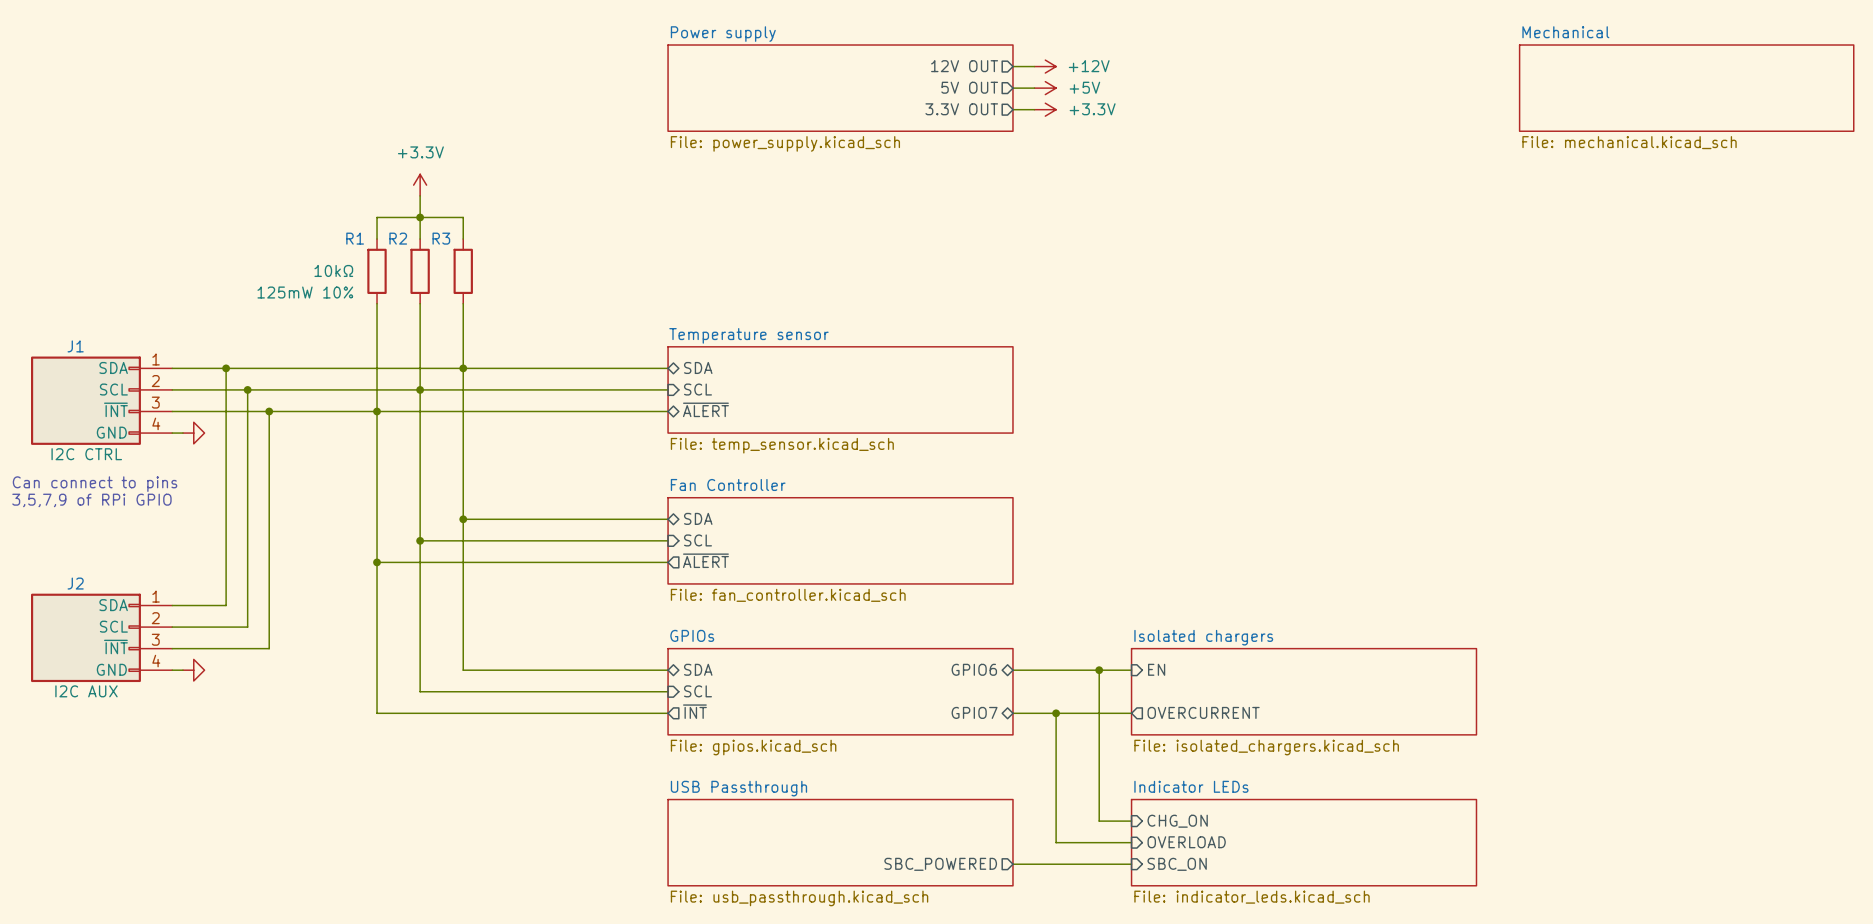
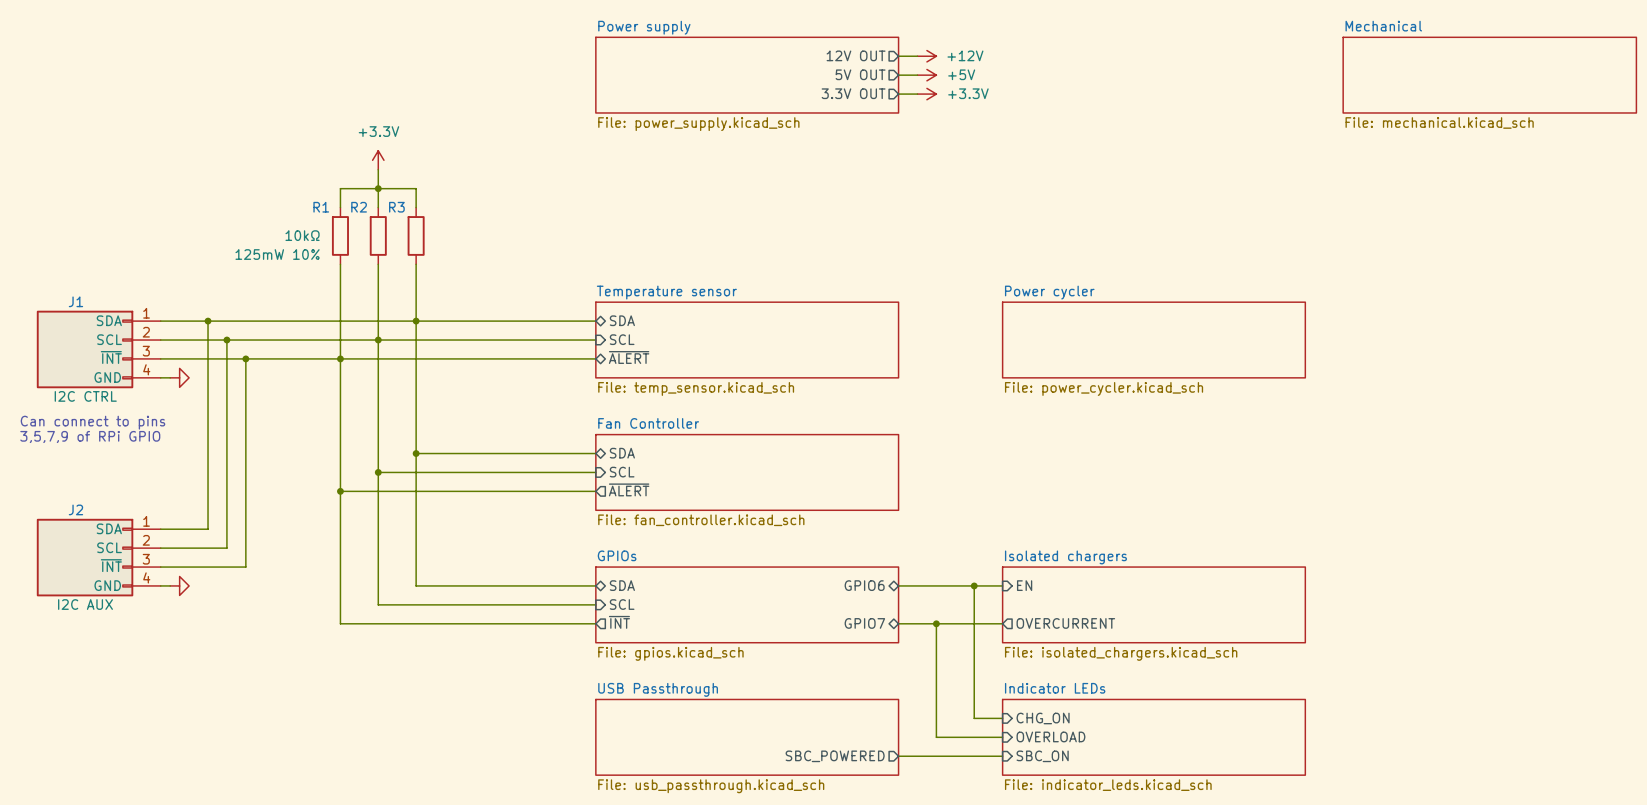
sheet Power cycler: none -> File: power_cycler.kicad_sch (1153, 340)

